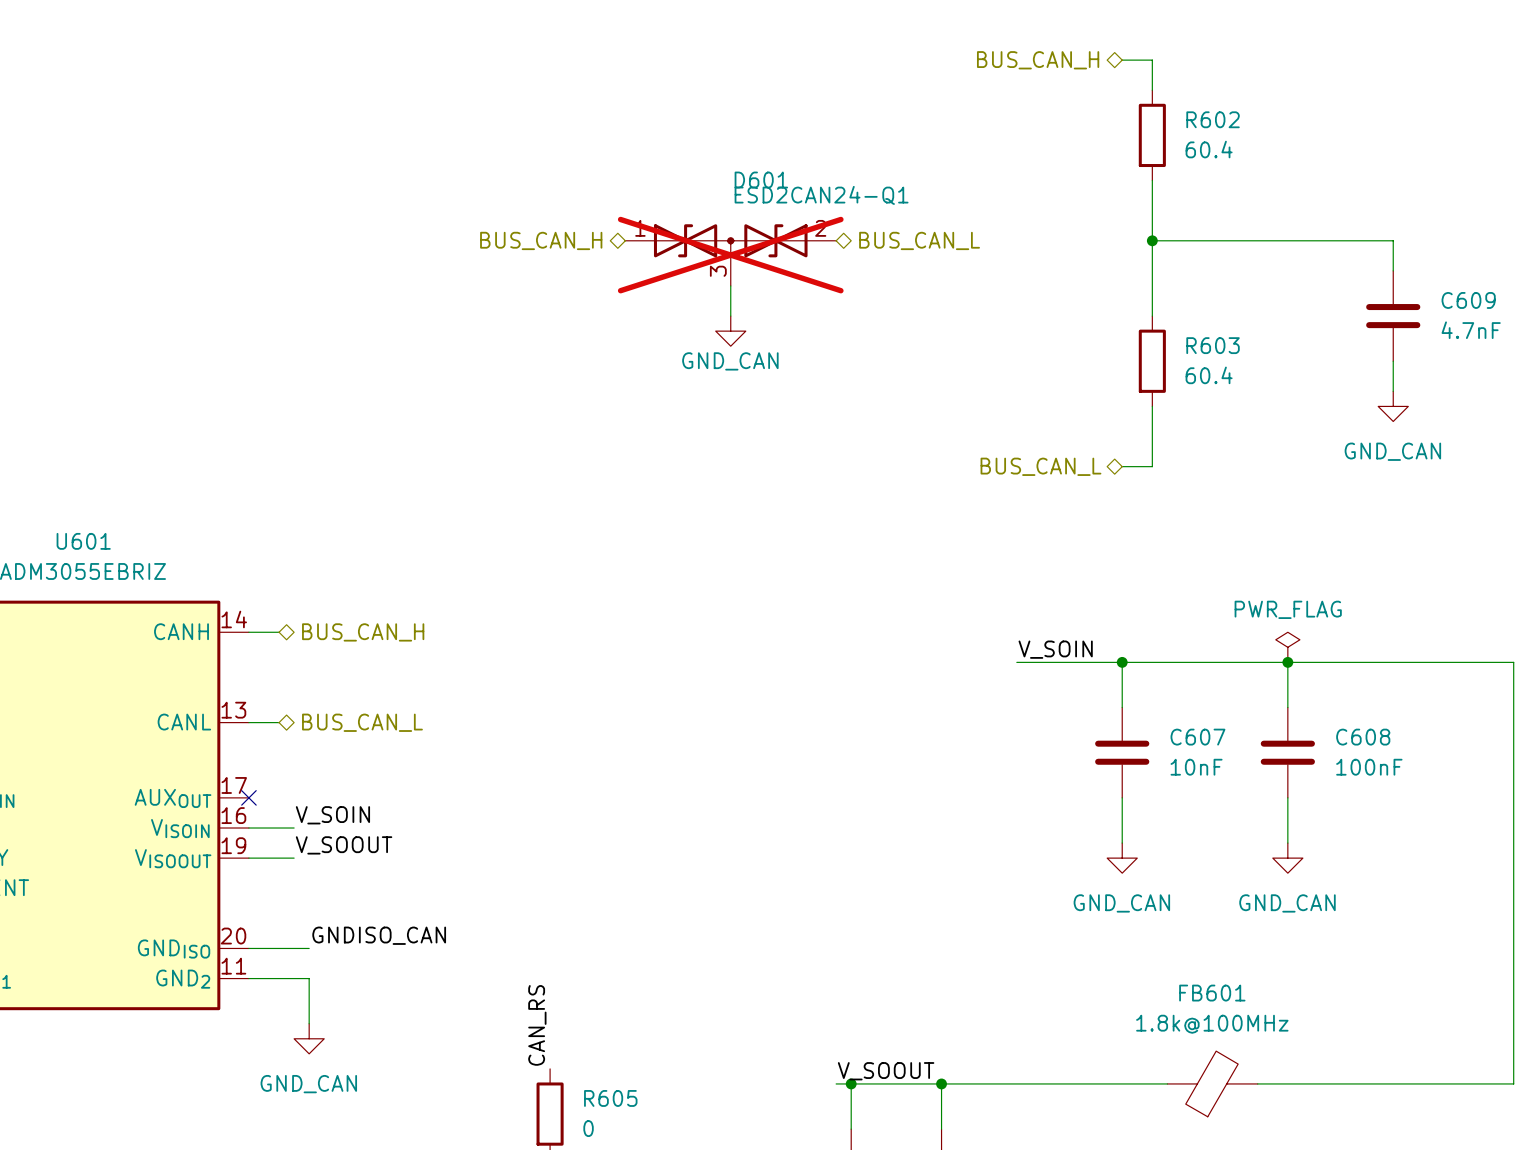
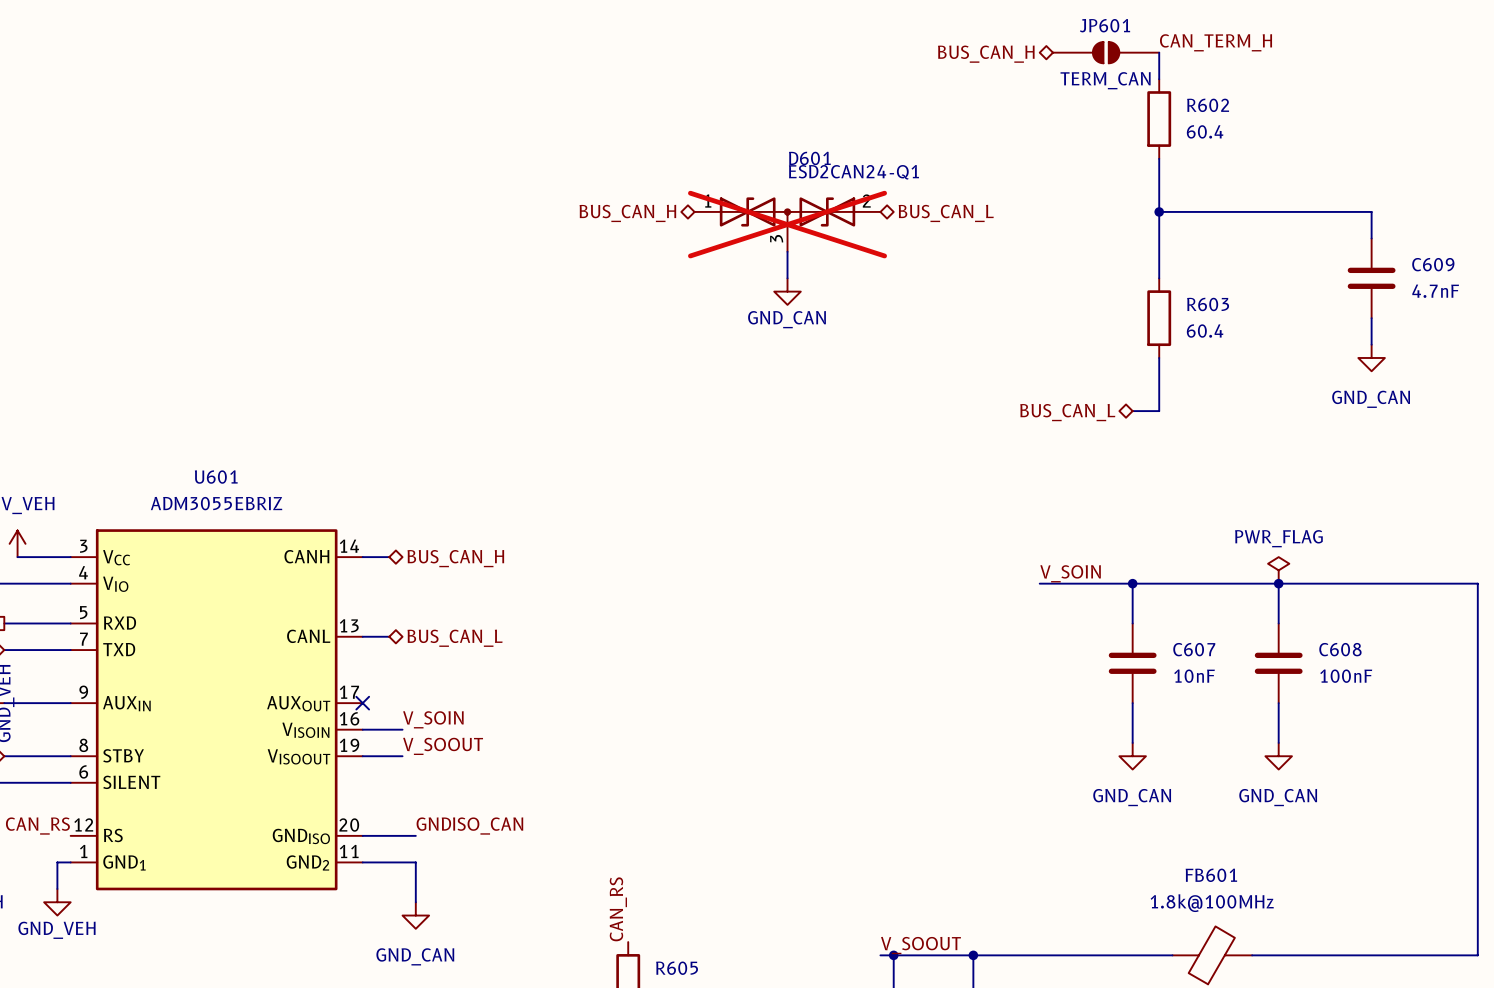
label: none -> CAN_TERM_H (1216, 42)
hierarchical label position: BUS_CAN_H (1038, 60) -> BUS_CAN_H (986, 54)
JP601: none -> TERM_CAN (1106, 52)

